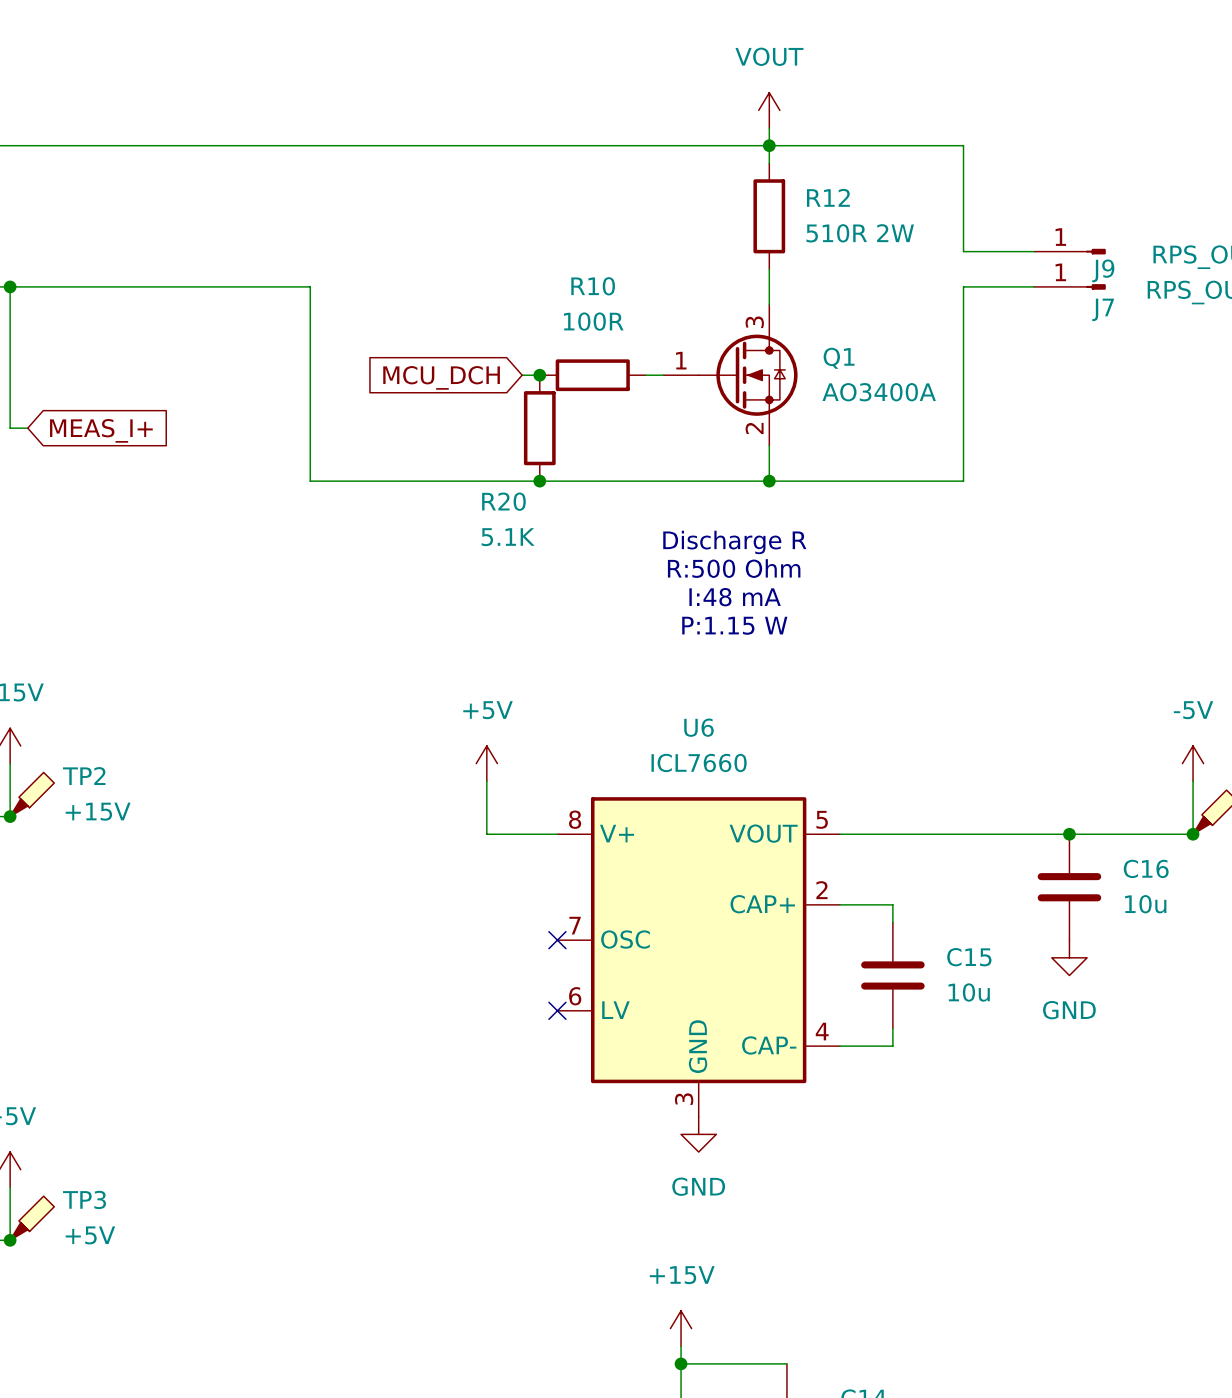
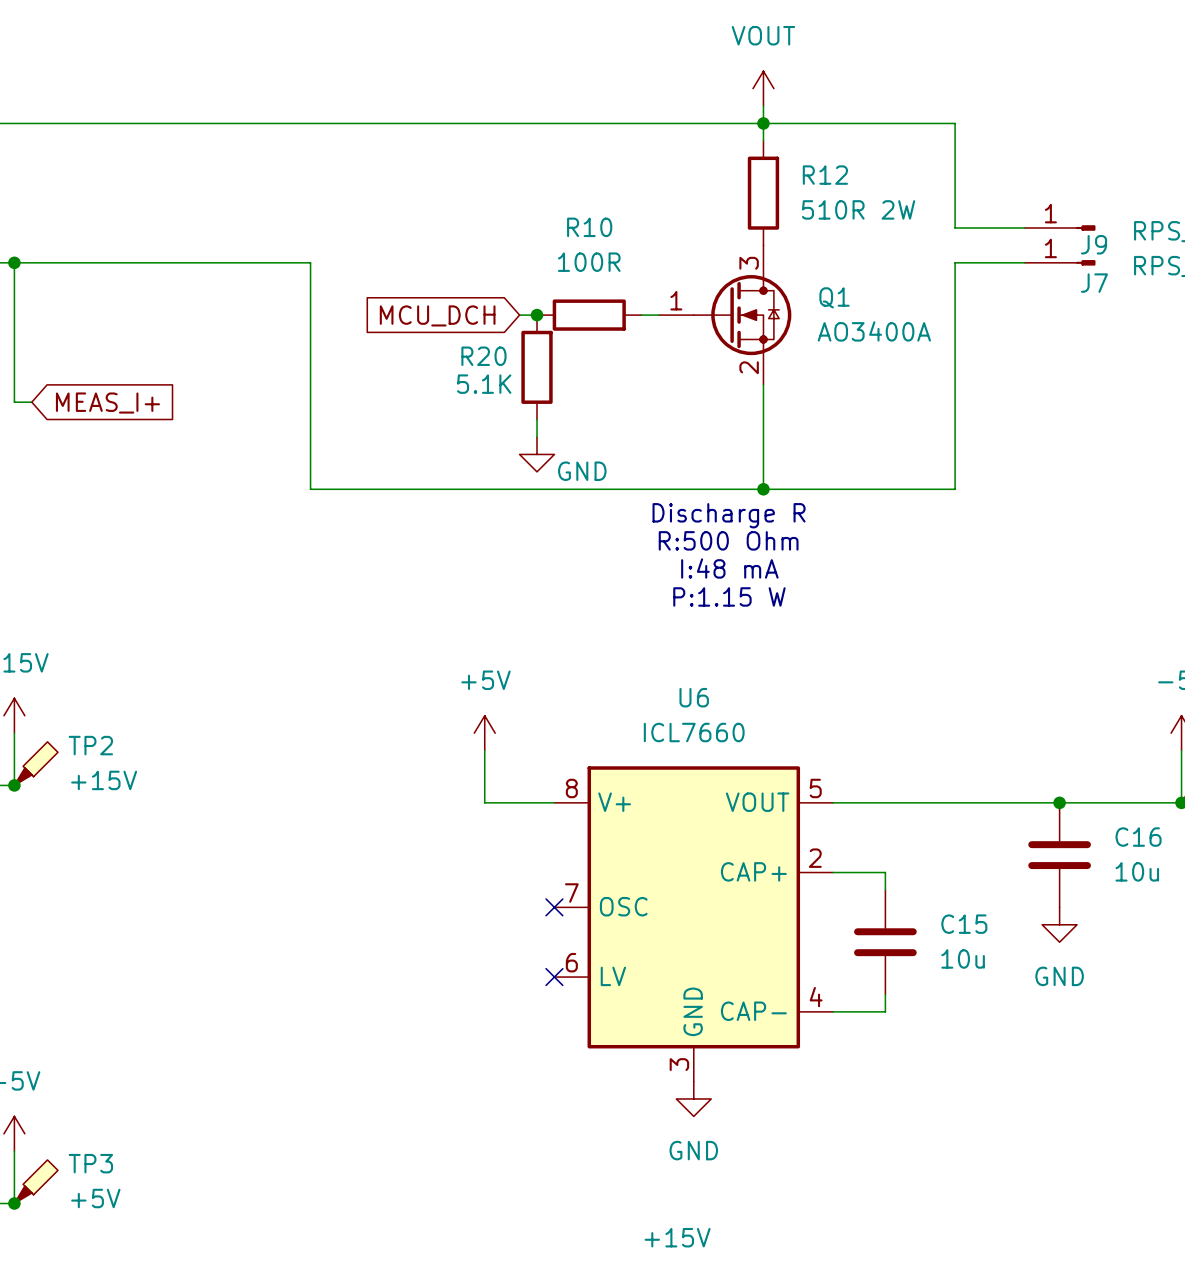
wire: (522, 375) (539, 375) -> (519, 315) (537, 315)
junction position: (539, 375) -> (537, 315)
R10 position: (592, 375) -> (589, 315)
wire: (645, 375) (663, 375) -> (641, 315) (658, 315)
Q1 position: (730, 375) -> (725, 315)
global label position: MCU_DCH (441, 377) -> MCU_DCH (437, 315)
R20 position: (539, 428) -> (537, 367)
wire: none -> (537, 419) (537, 437)
wire: (310, 481) (963, 481) -> (310, 454) (310, 489) (955, 489) (955, 454)
junction: (539, 481) -> none
power symbol: none -> GND (537, 454)
wire: none -> (763, 454) (763, 489)
junction position: (769, 481) -> (763, 489)
R20 name position: R20 (503, 501) -> R20 (483, 356)
R20 value position: 5.1K (508, 537) -> 5.1K (484, 384)

